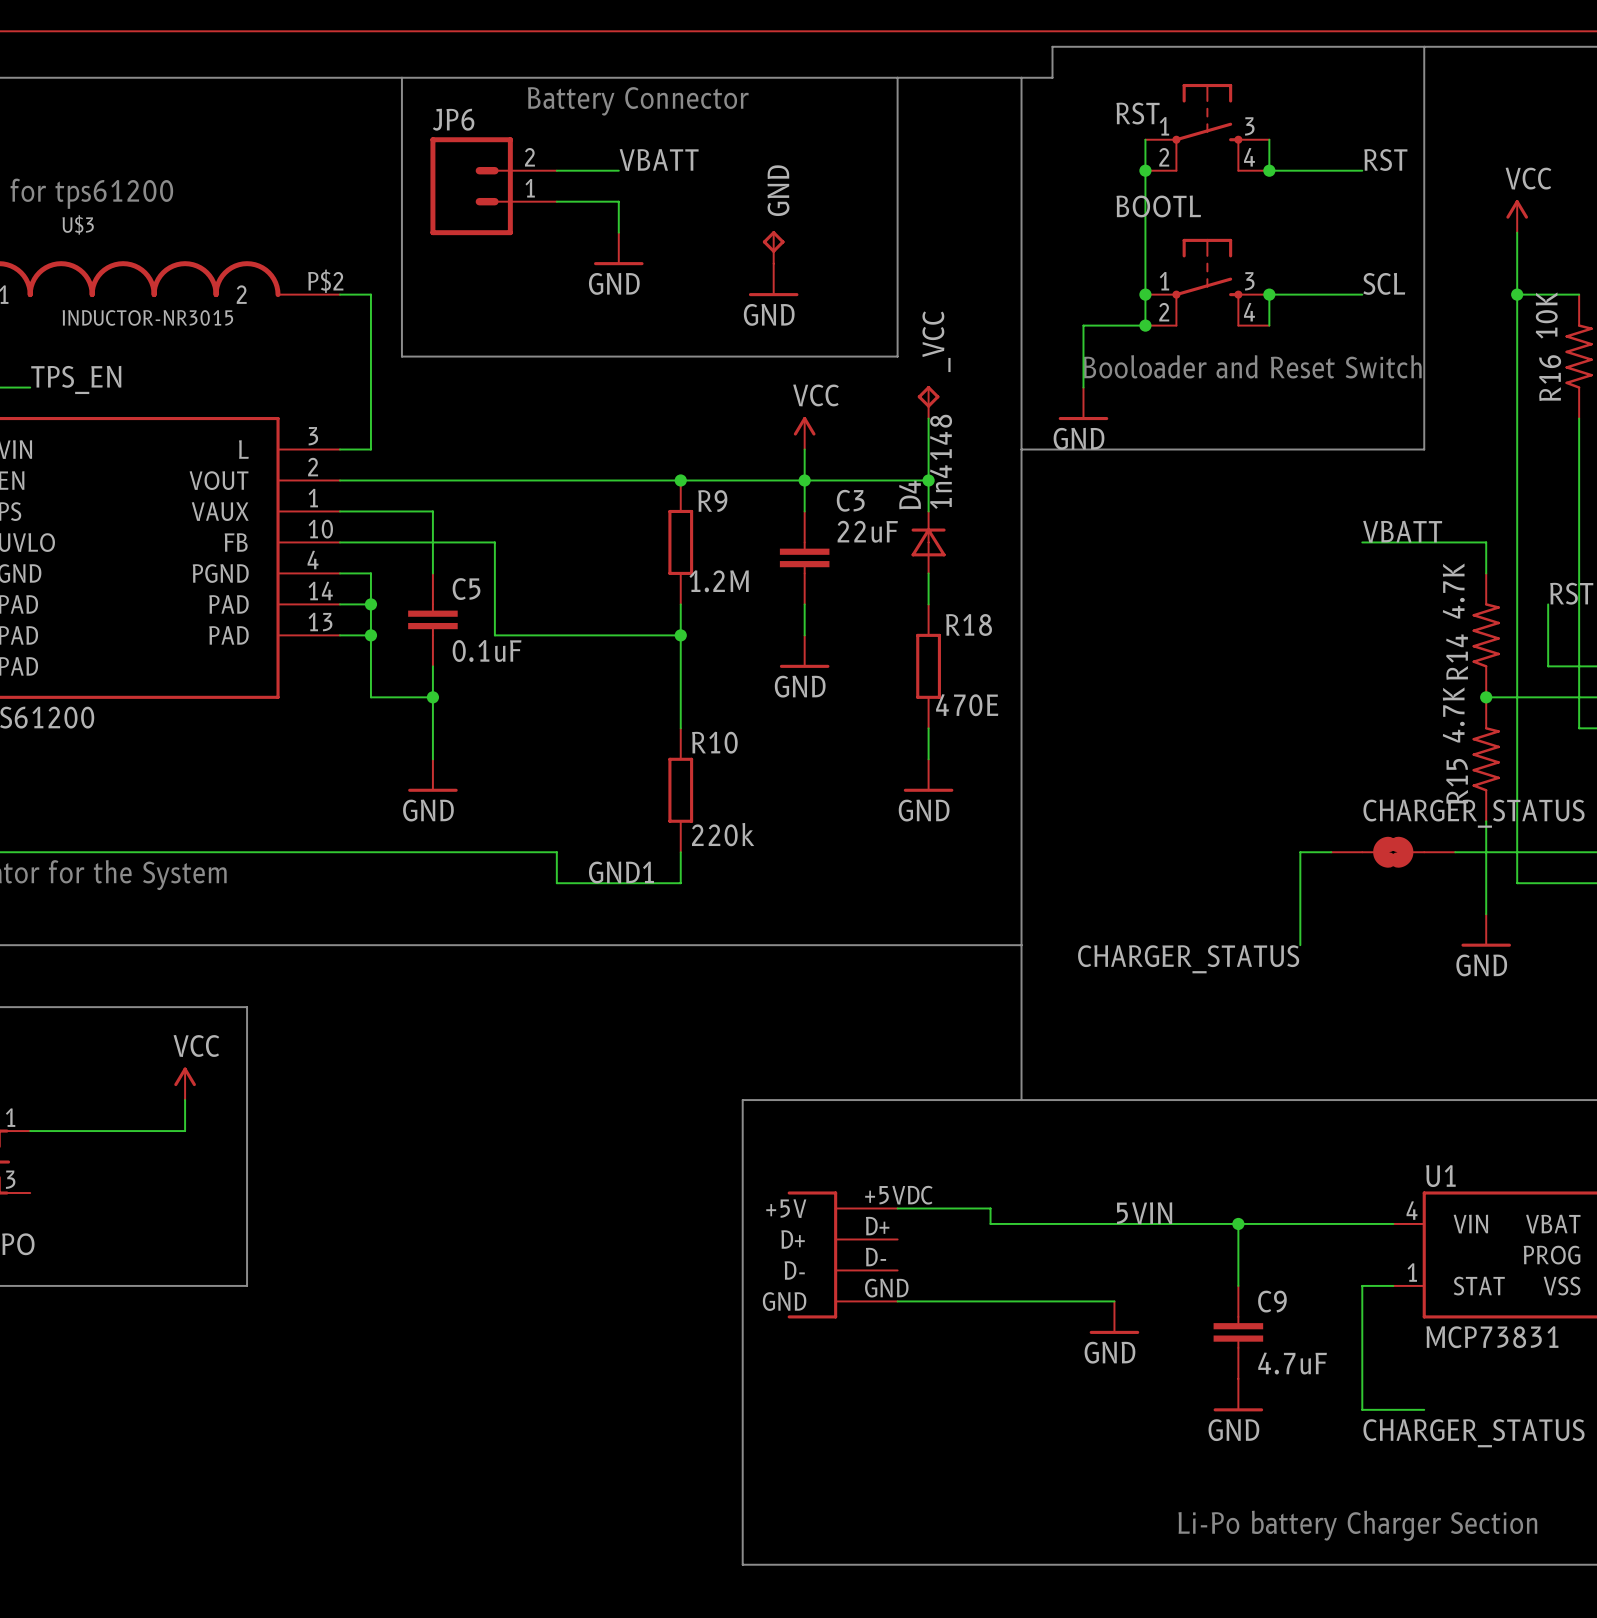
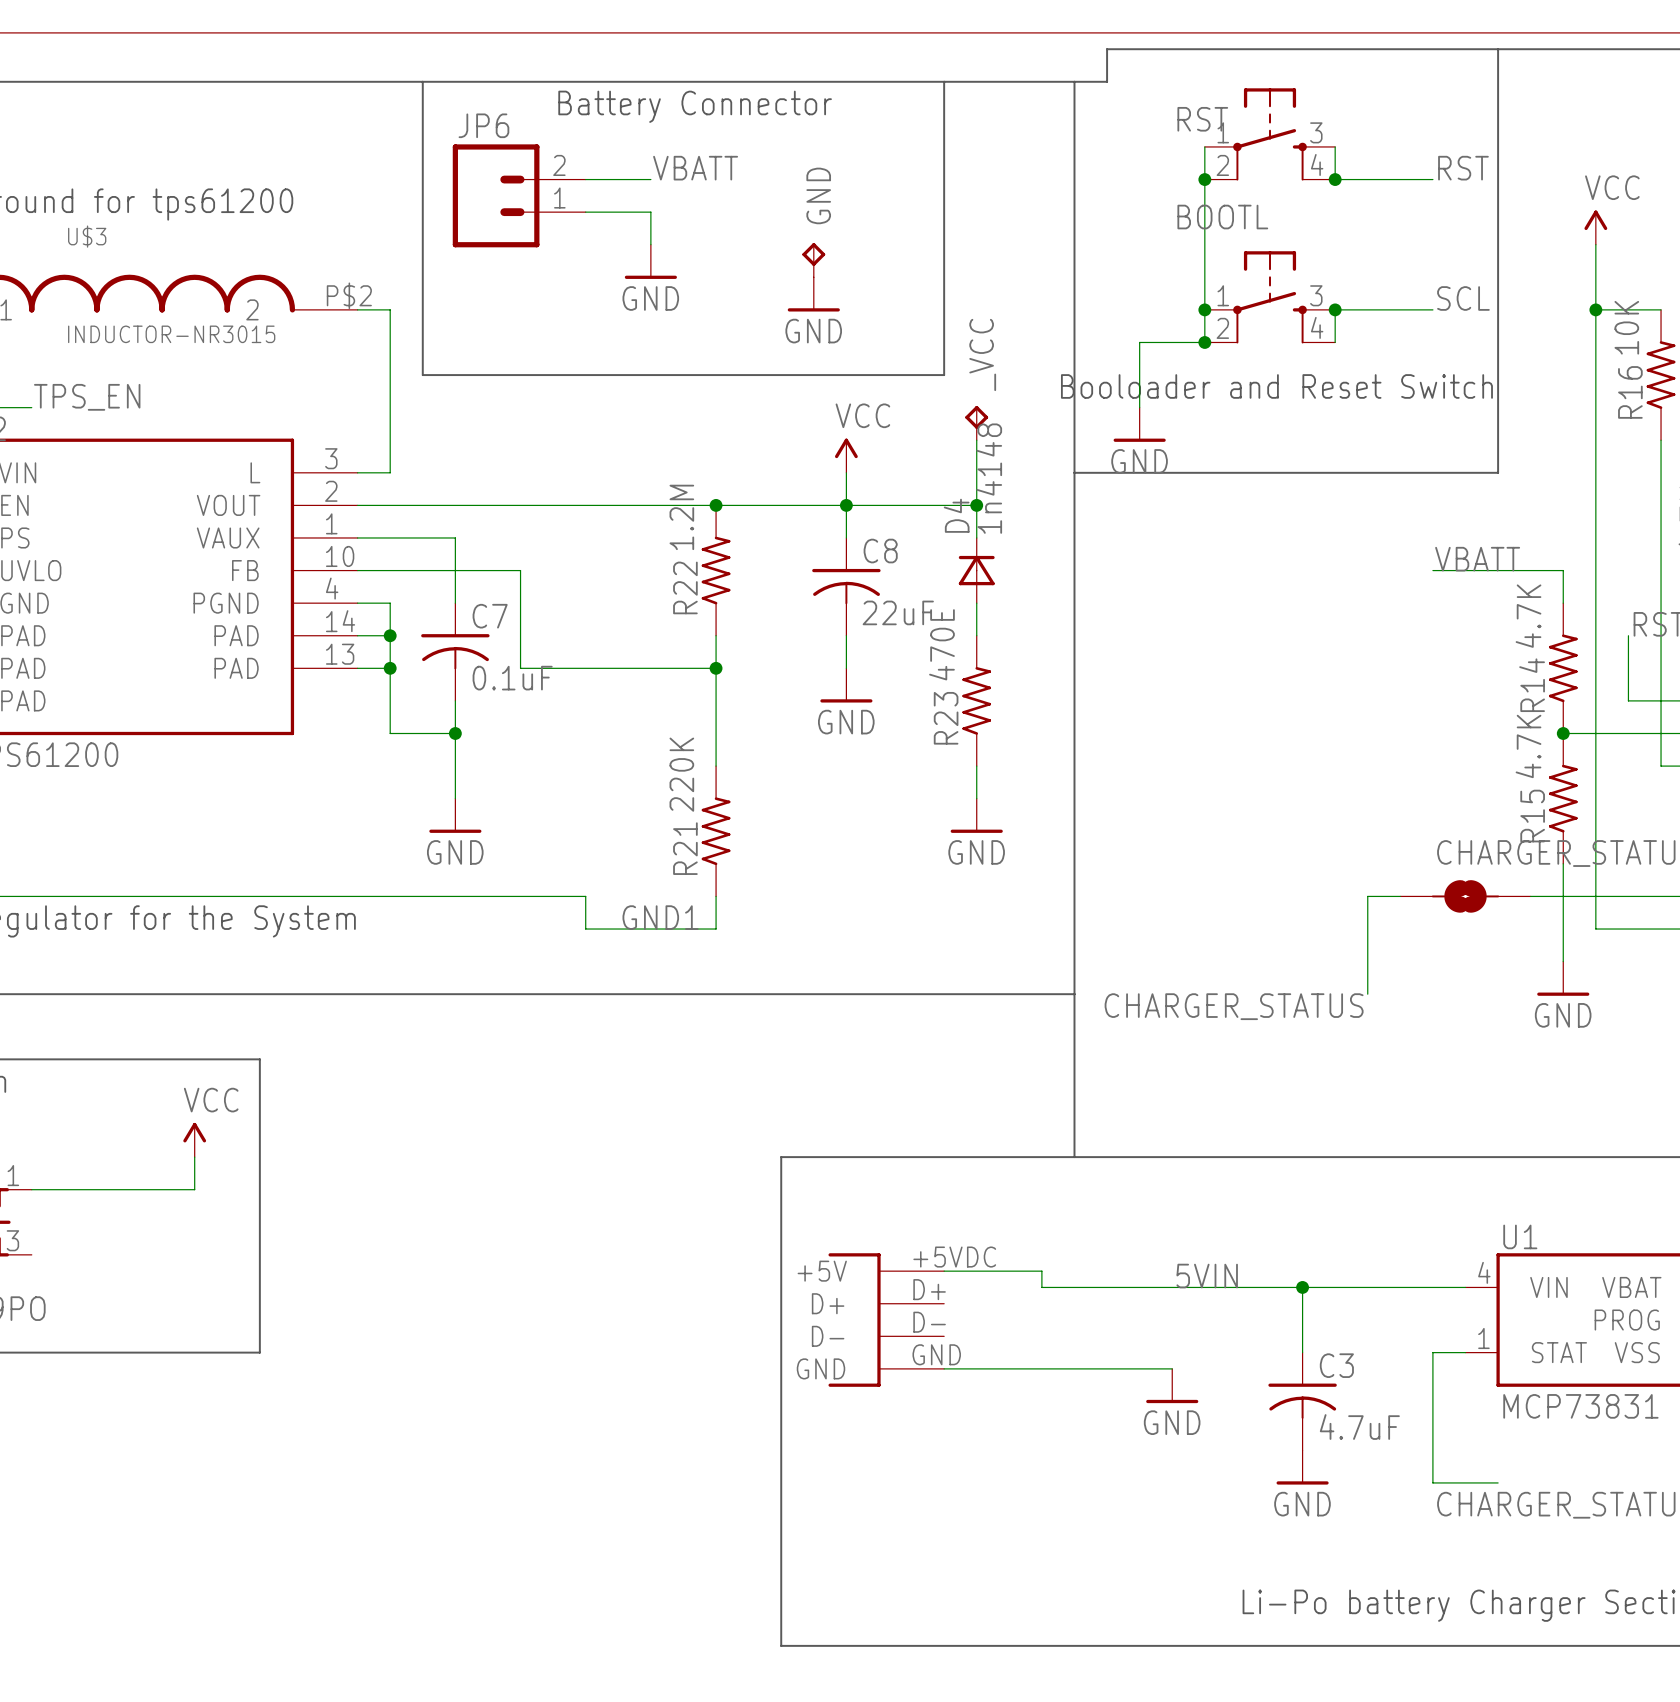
C3 name position: C3 (850, 500) -> C3 (1336, 1365)
C3 symbol: [779, 511, 830, 605] -> [1268, 1352, 1337, 1451]
C3 value: 22uF (867, 531) -> 4.7uF (1359, 1427)
R9: 1.2M (680, 542) -> none
R22: none -> 1.2M (716, 570)
C8: none -> 22uF (846, 586)
C5: 0.1uF (432, 619) -> none
C7: none -> 0.1uF (455, 652)
R18: 470E (928, 666) -> none
R23: none -> 470E (976, 700)
R10: 220k (680, 790) -> none
R21: none -> 220K (716, 831)
C9: 4.7uF (1238, 1332) -> none

